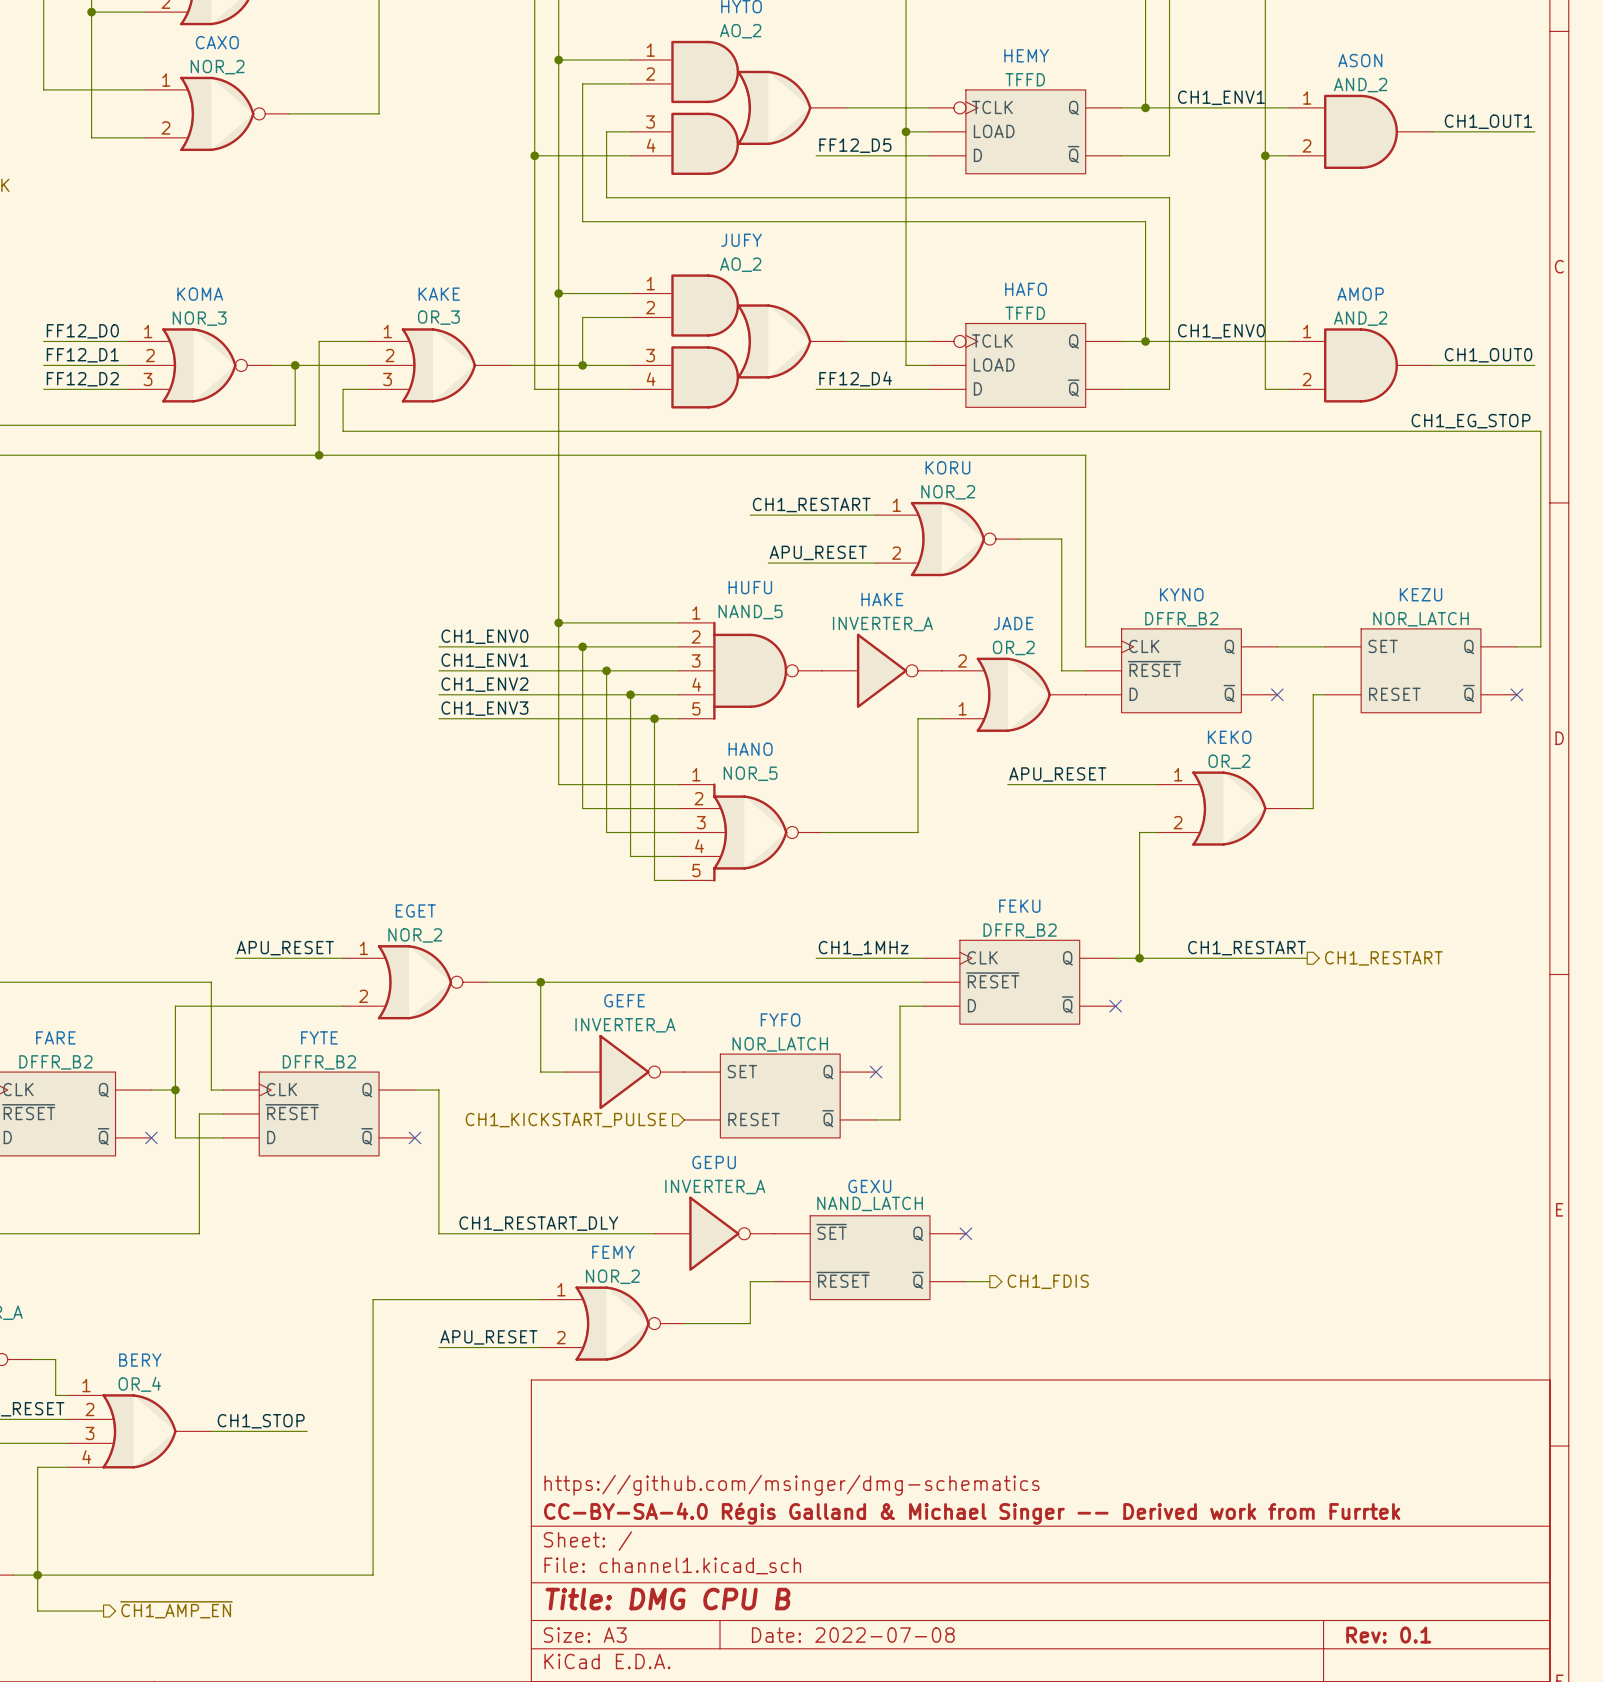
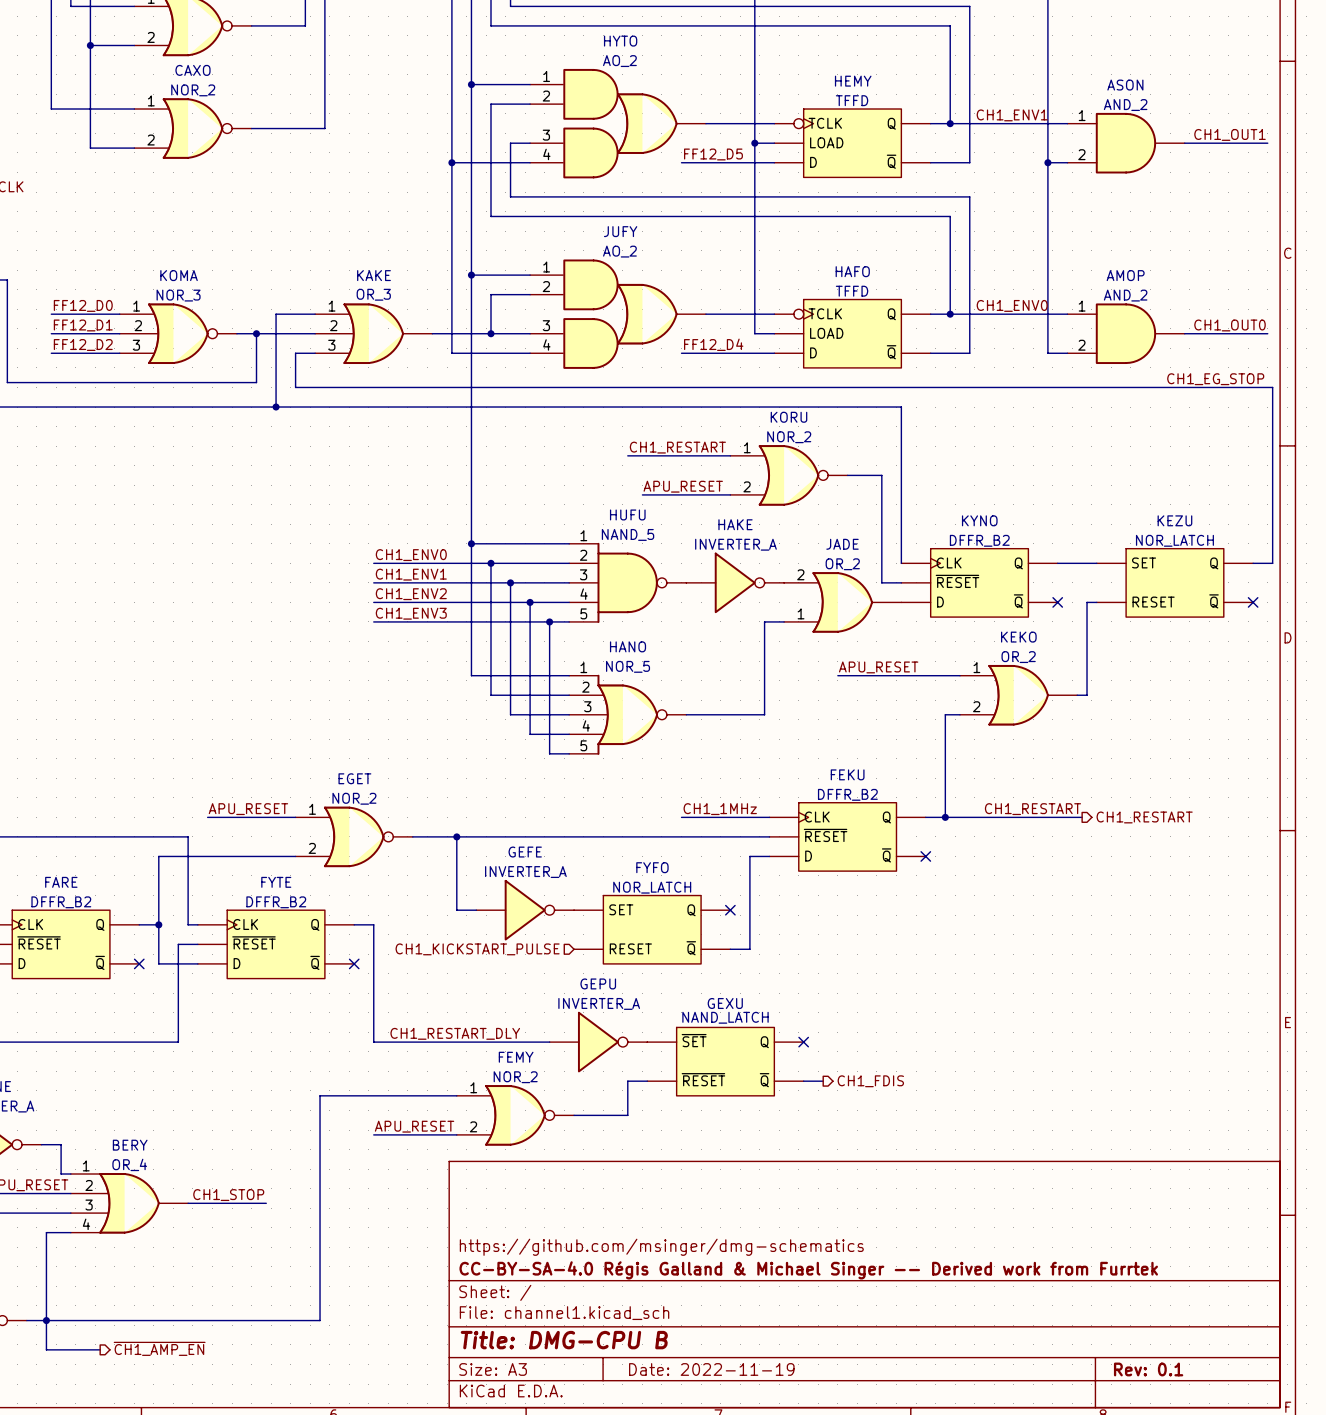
title block: Title: DMG CPU B (668, 1599) -> Title: DMG-CPU B (564, 1340)
title block: Date: 2022-07-08 (853, 1635) -> Date: 2022-11-19 (711, 1369)

